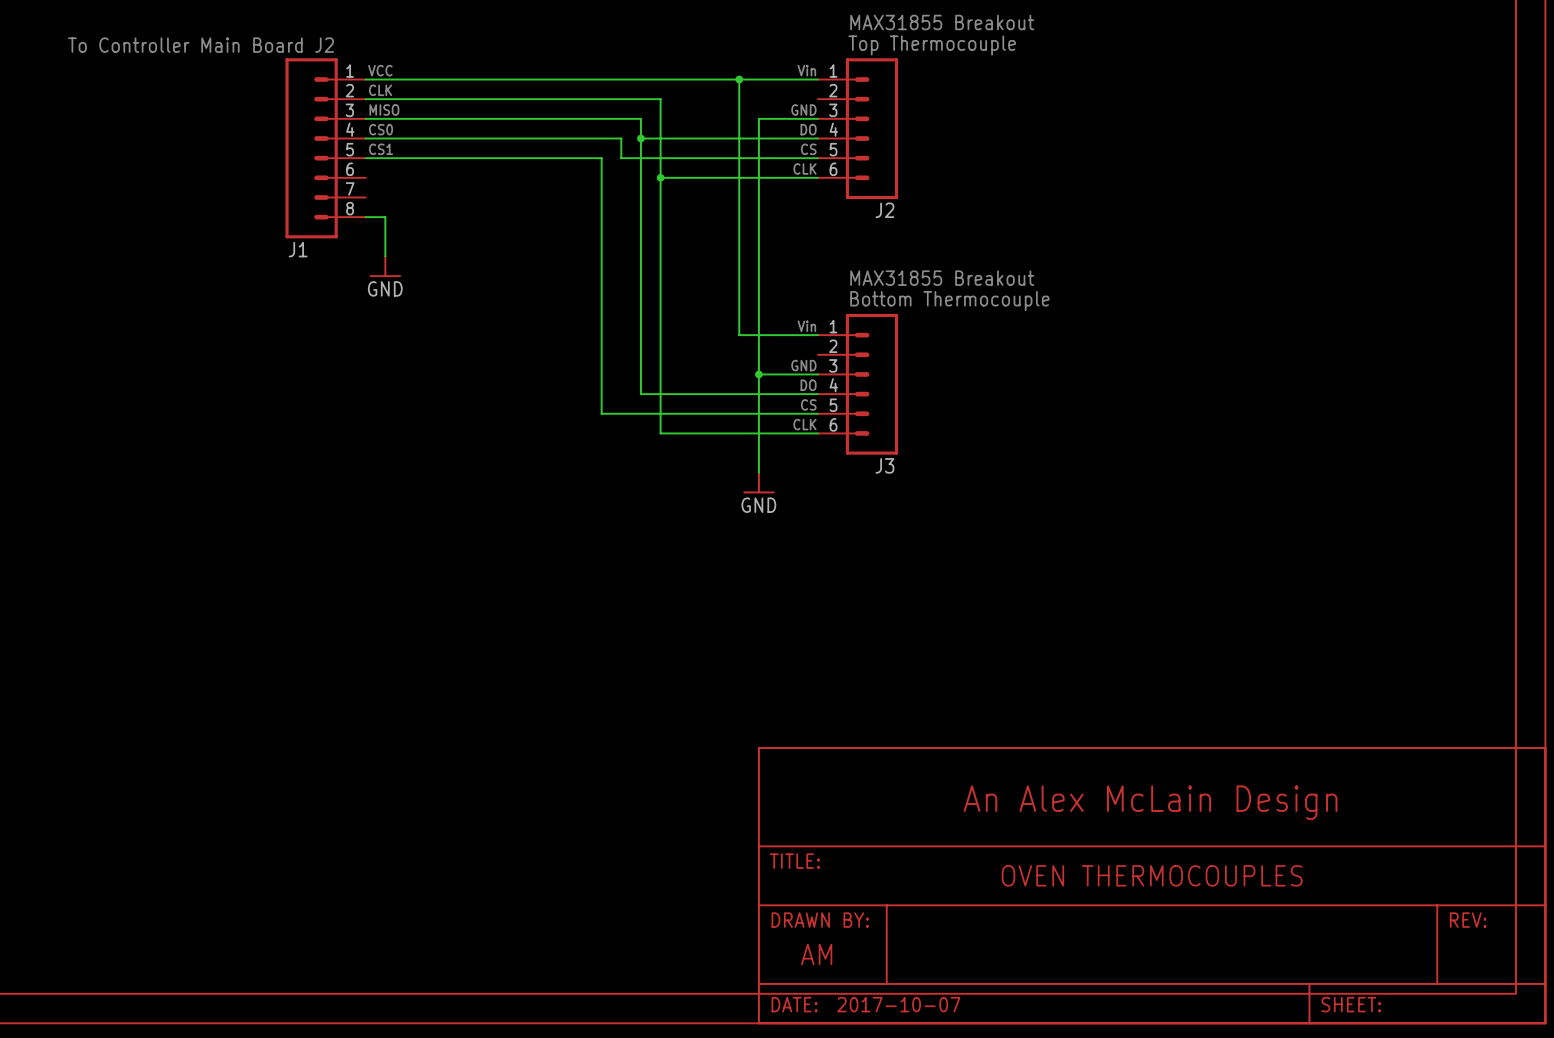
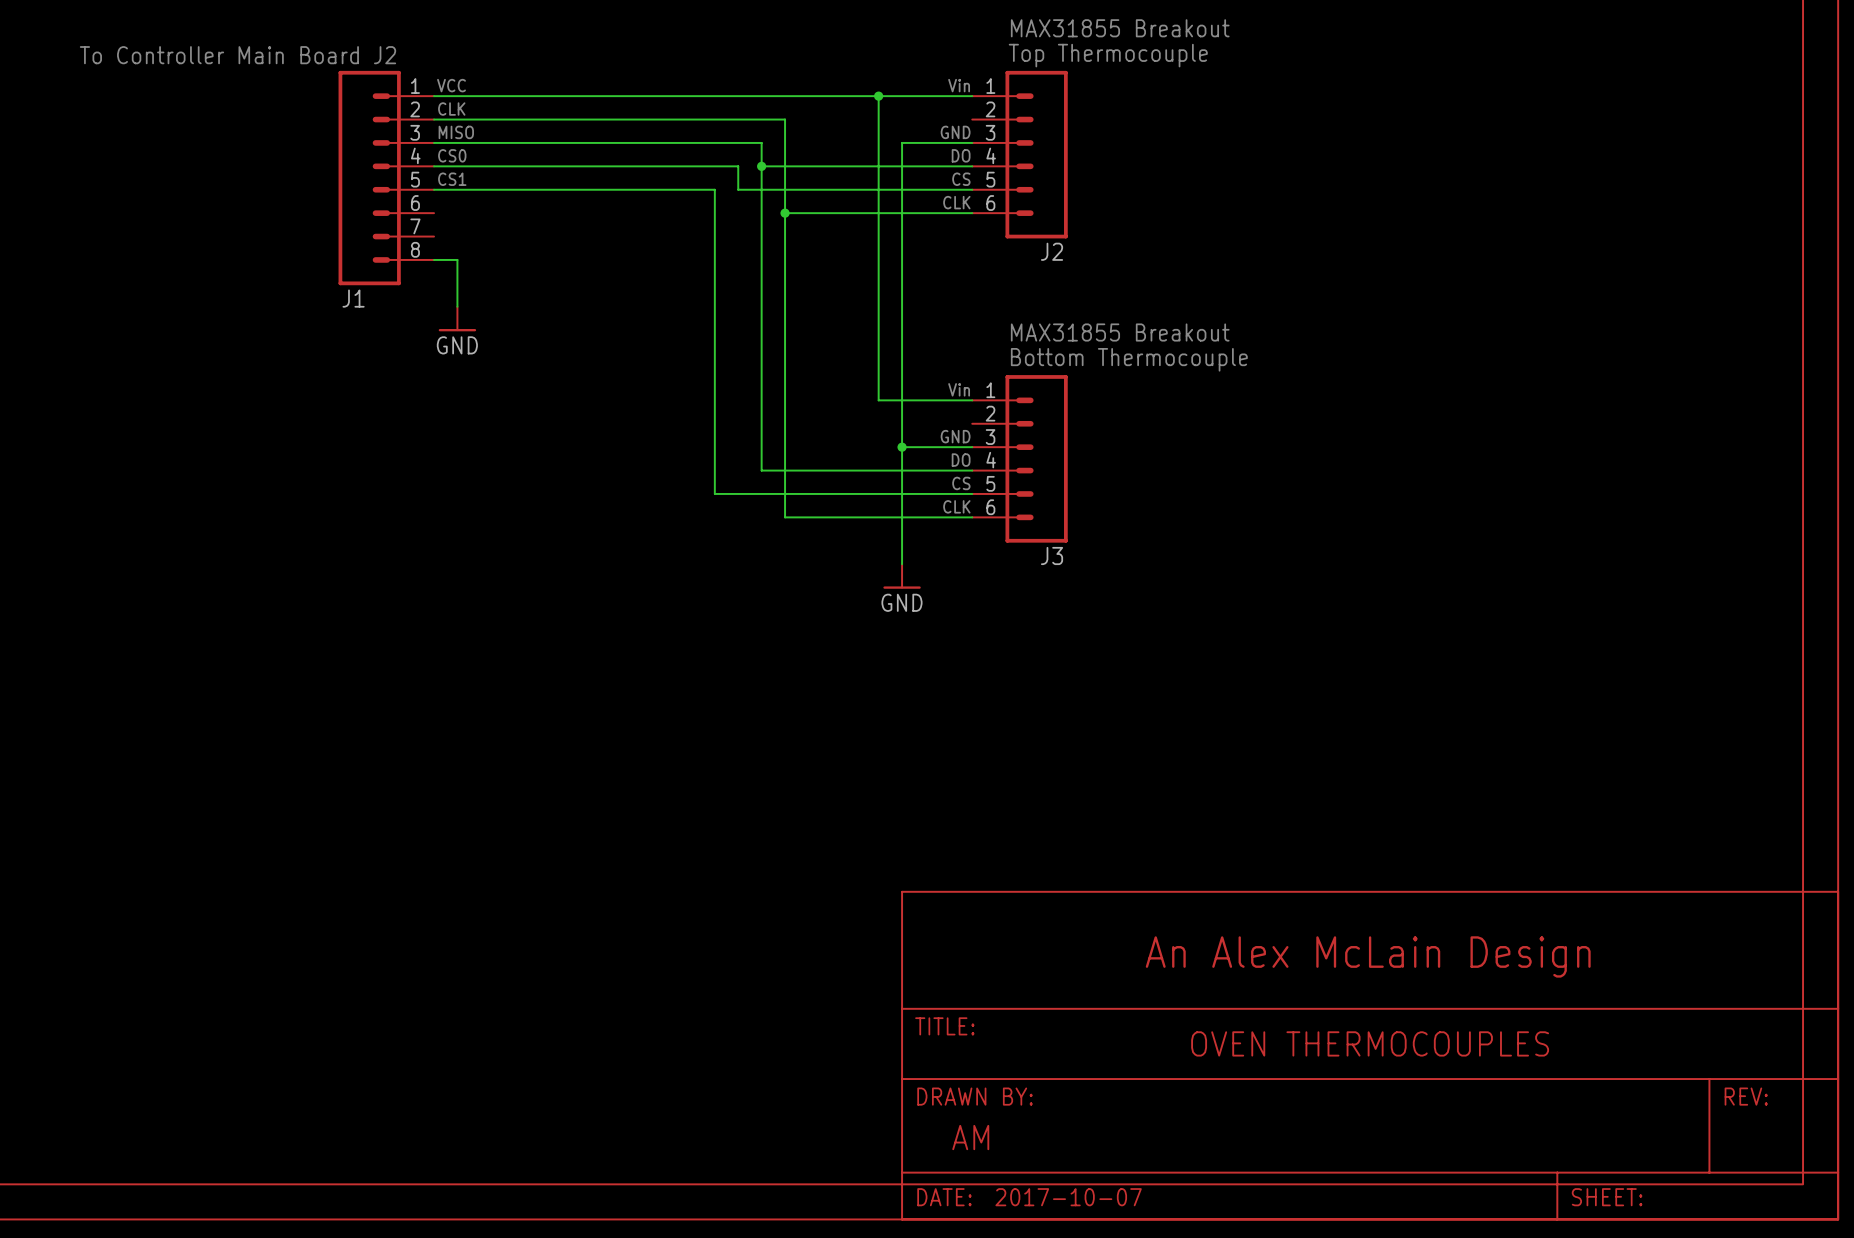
part symbol: [758, 747, 1546, 1024] -> [901, 891, 1839, 1220]

